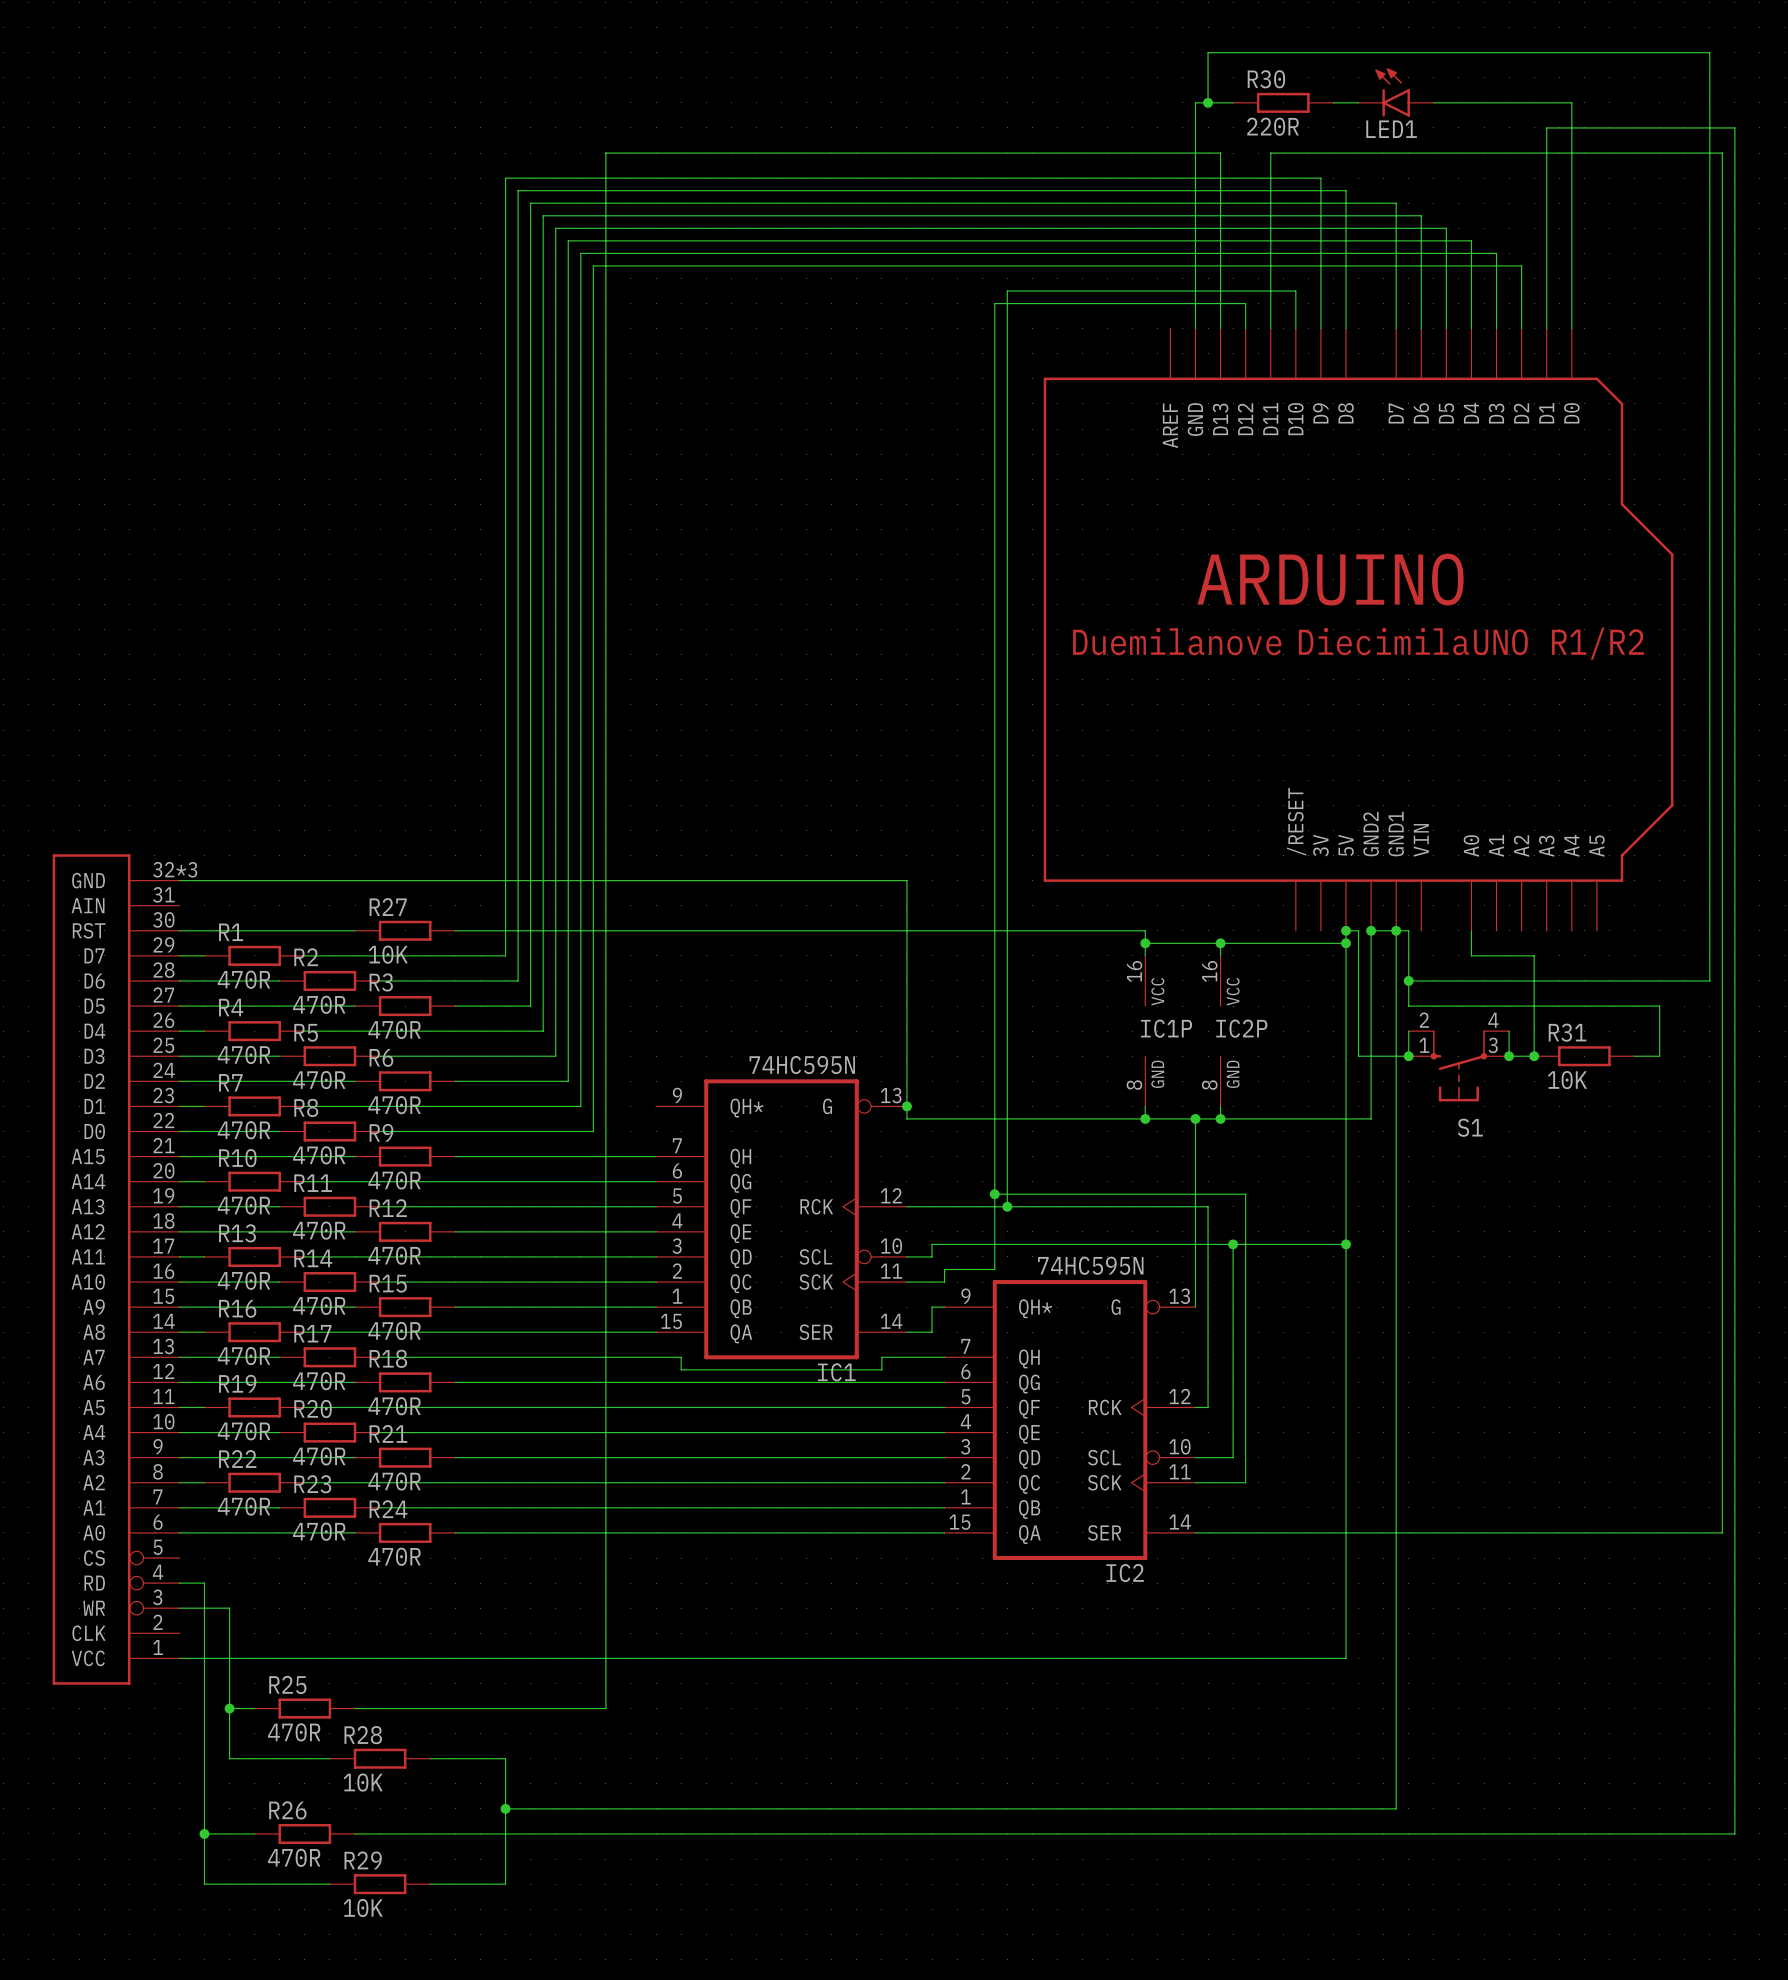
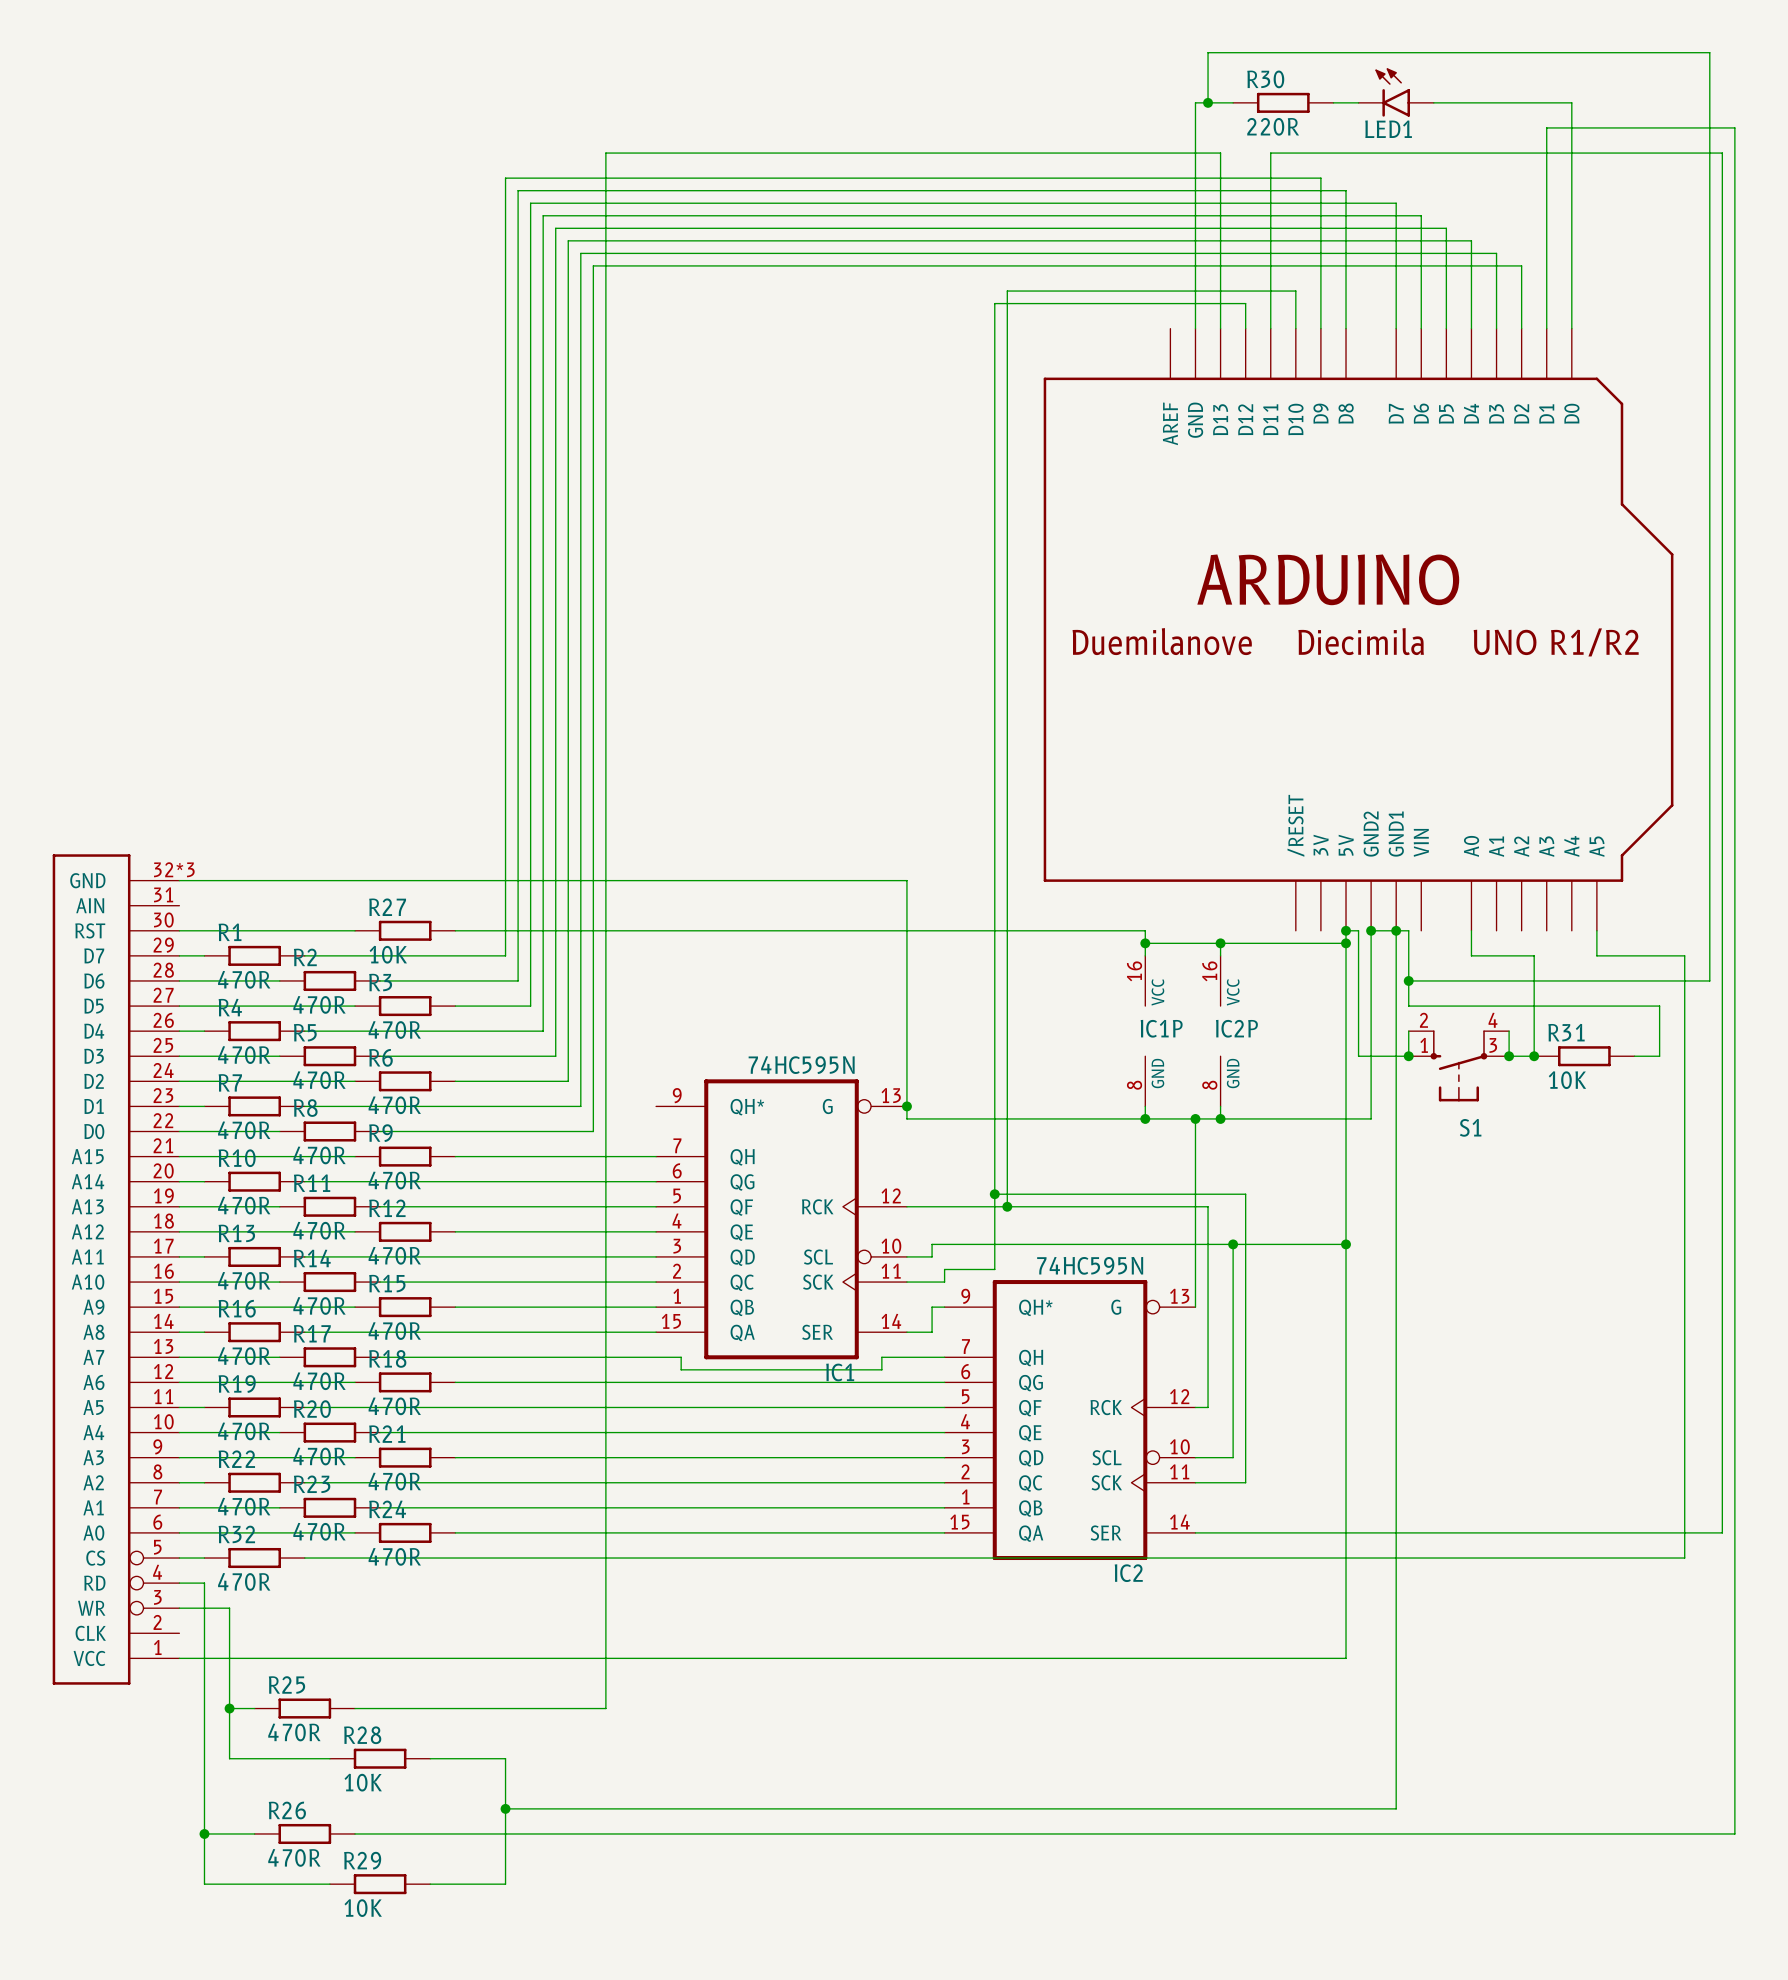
wire: none -> (1596, 930) (1596, 955) (1684, 955) (1684, 1558) (304, 1558)
wire: none -> (179, 1558) (204, 1558)
R32: none -> 470R (254, 1558)

